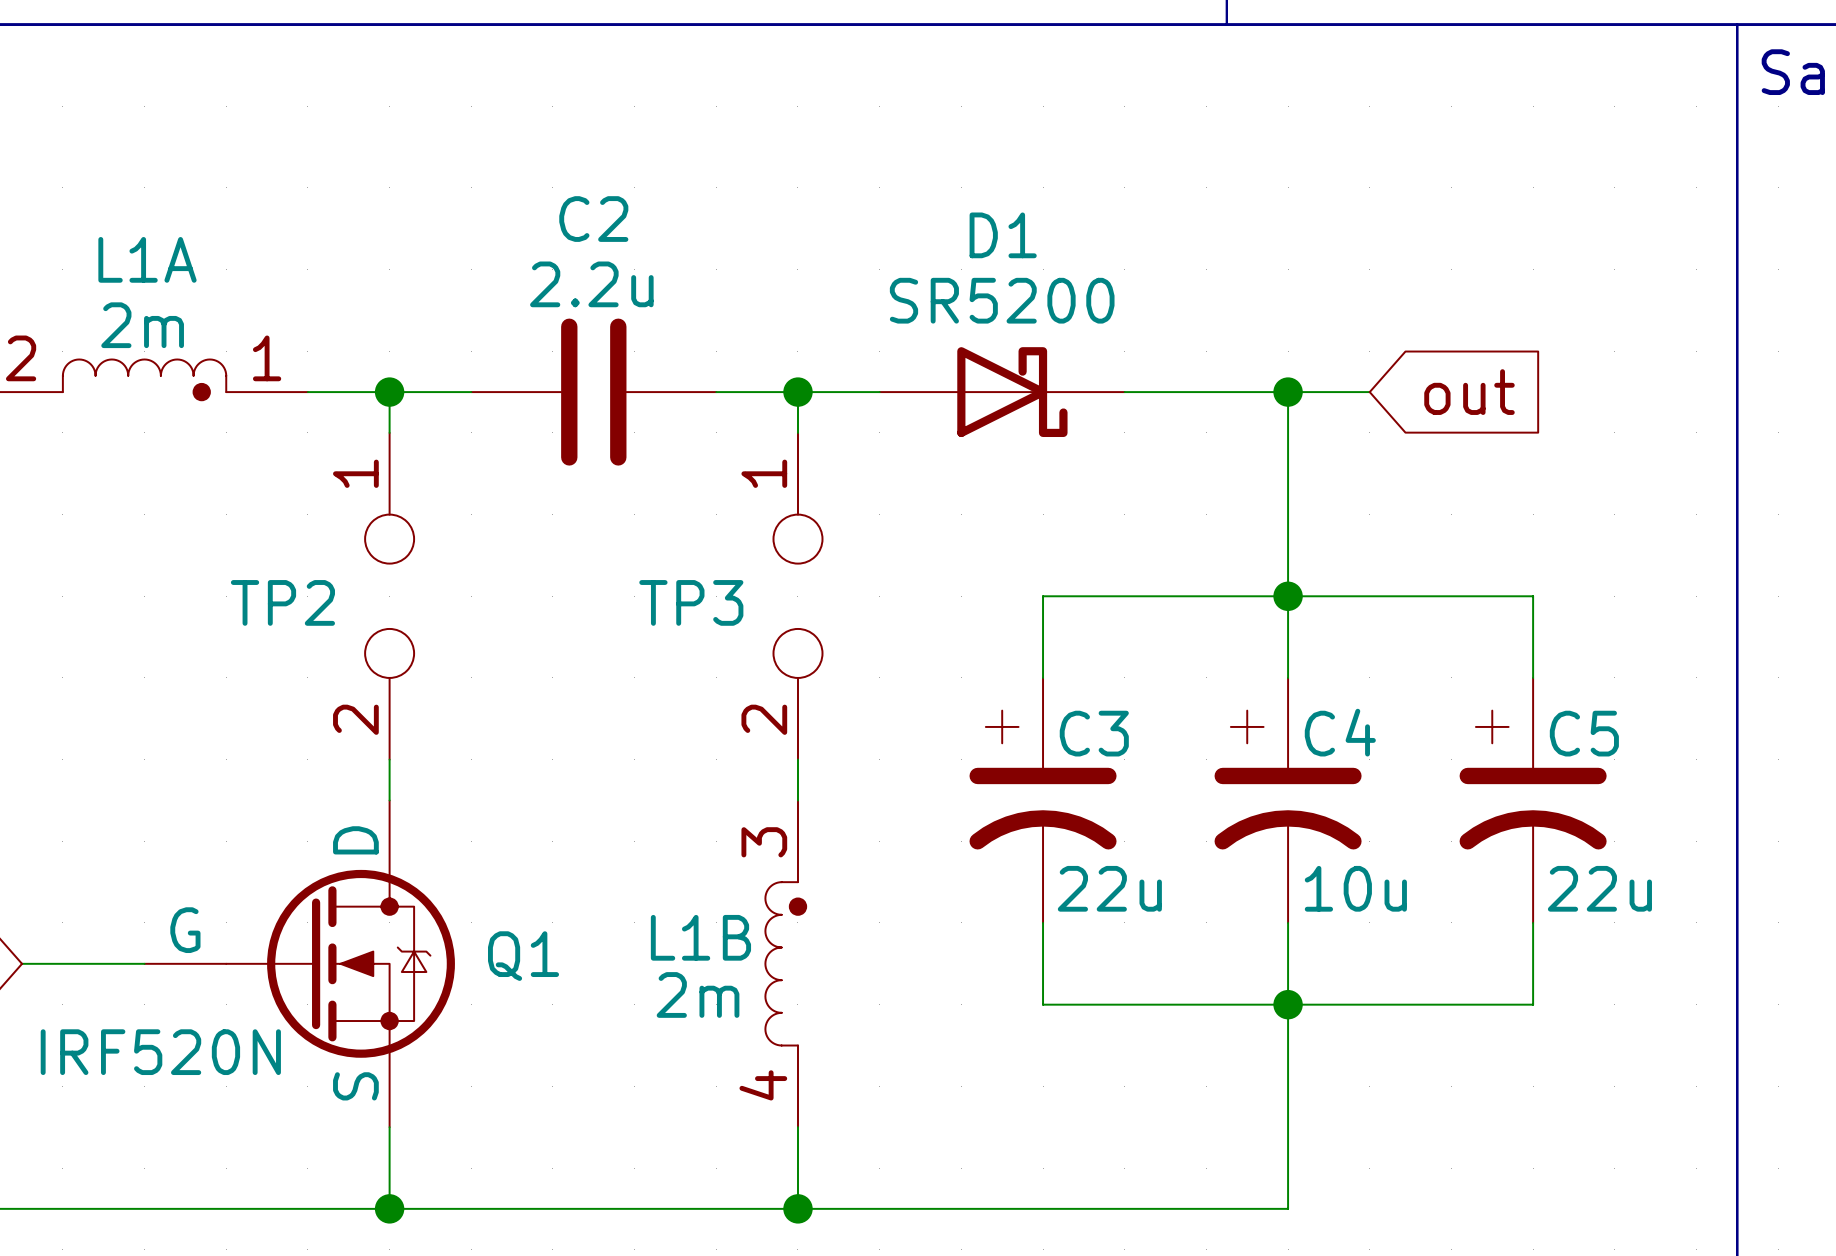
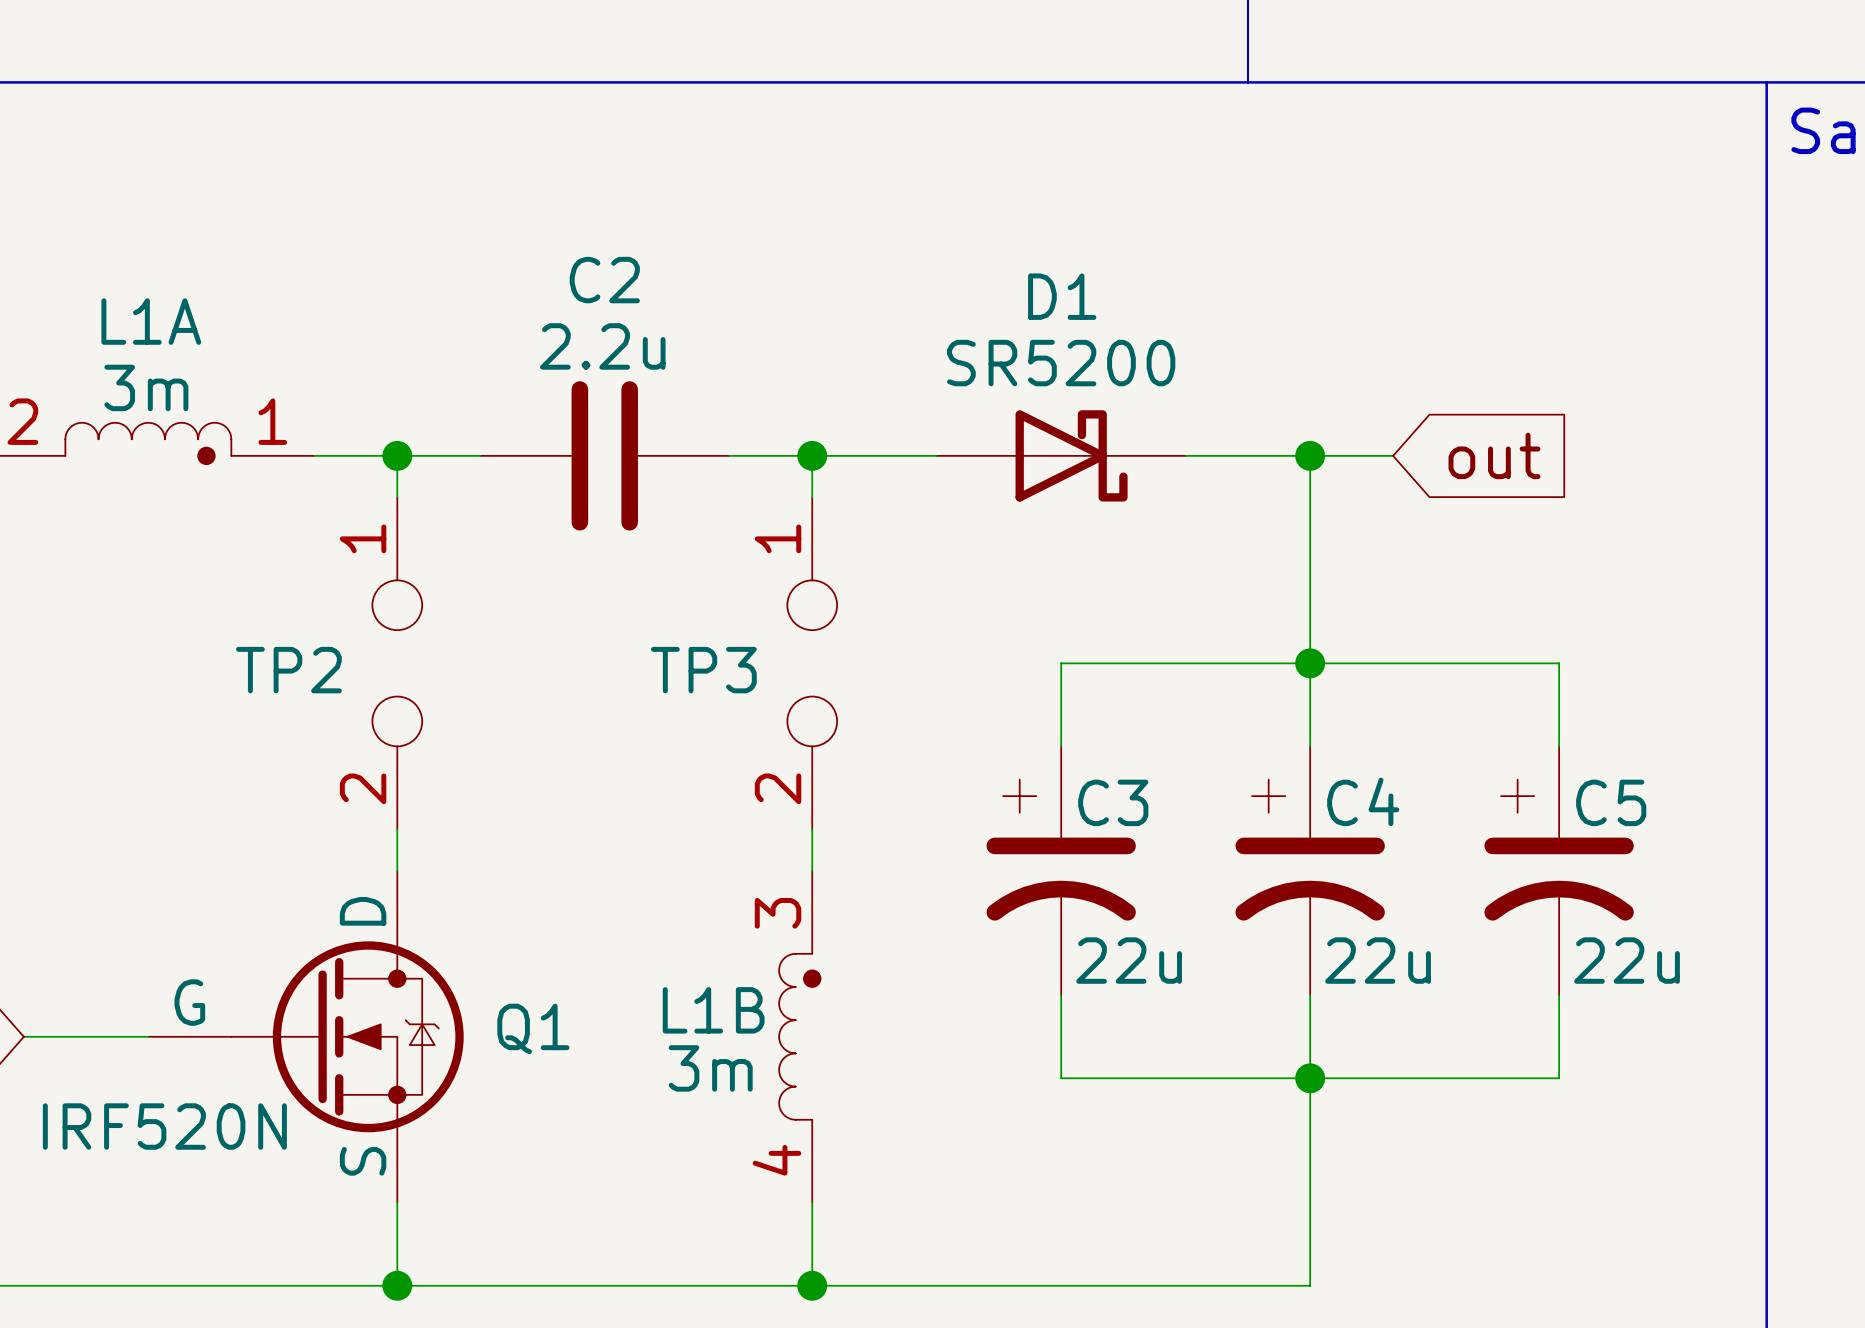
L1A value: 2m (142, 325) -> 3m (146, 387)
D1 position: (1002, 392) -> (1061, 455)
C4 value: 10u (1355, 888) -> 22u (1378, 960)
L1B value: 2m (698, 994) -> 3m (710, 1068)

